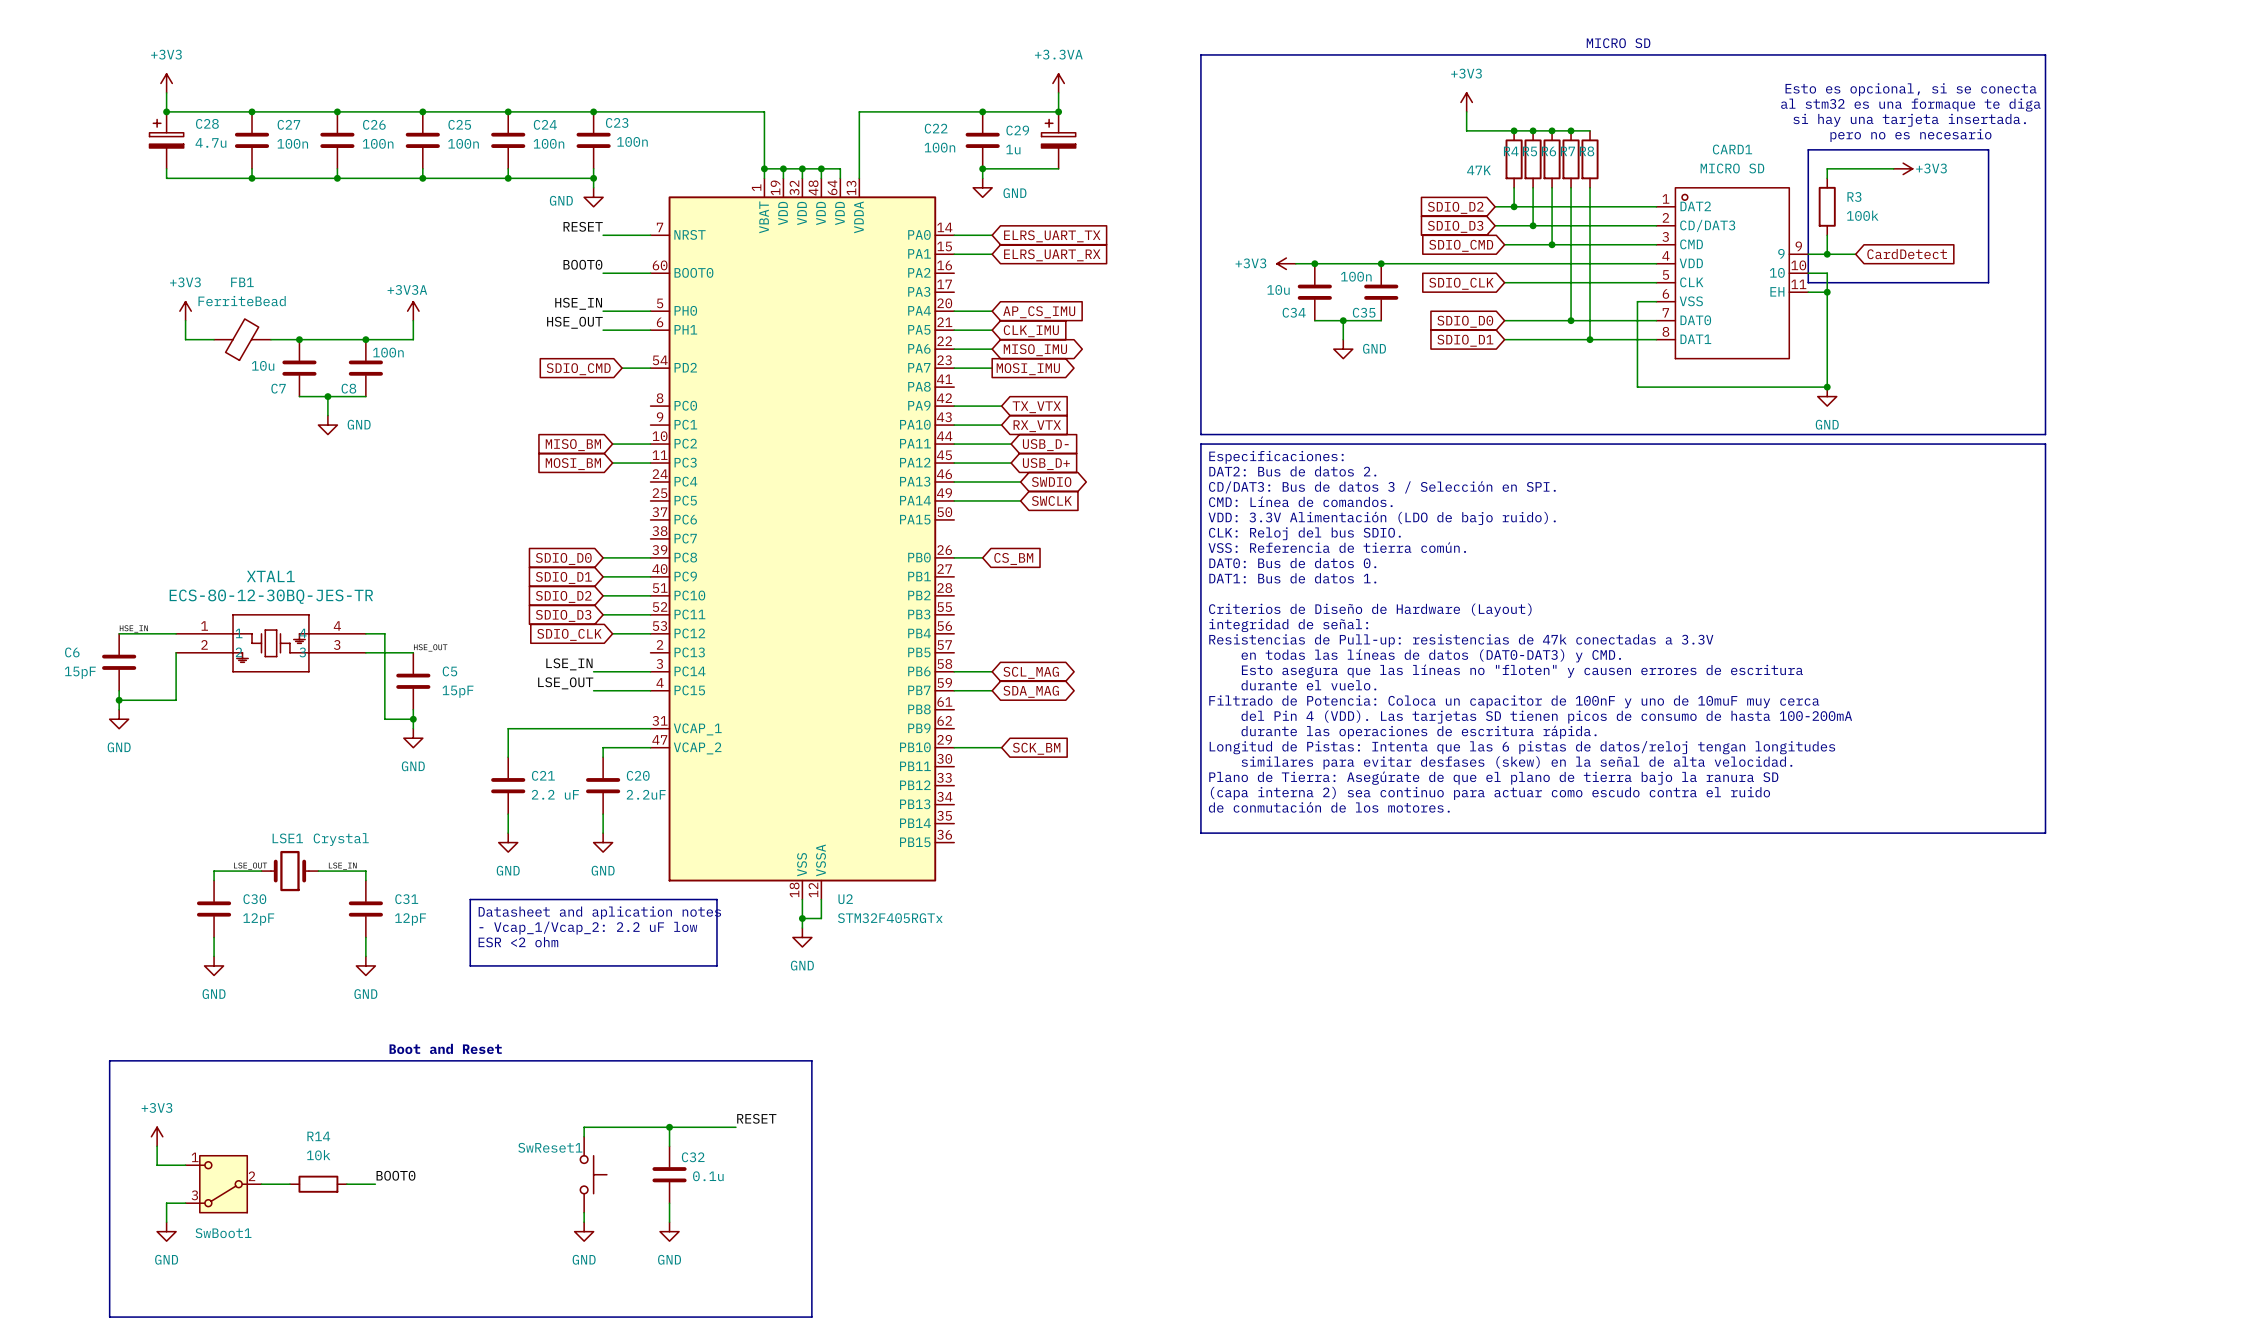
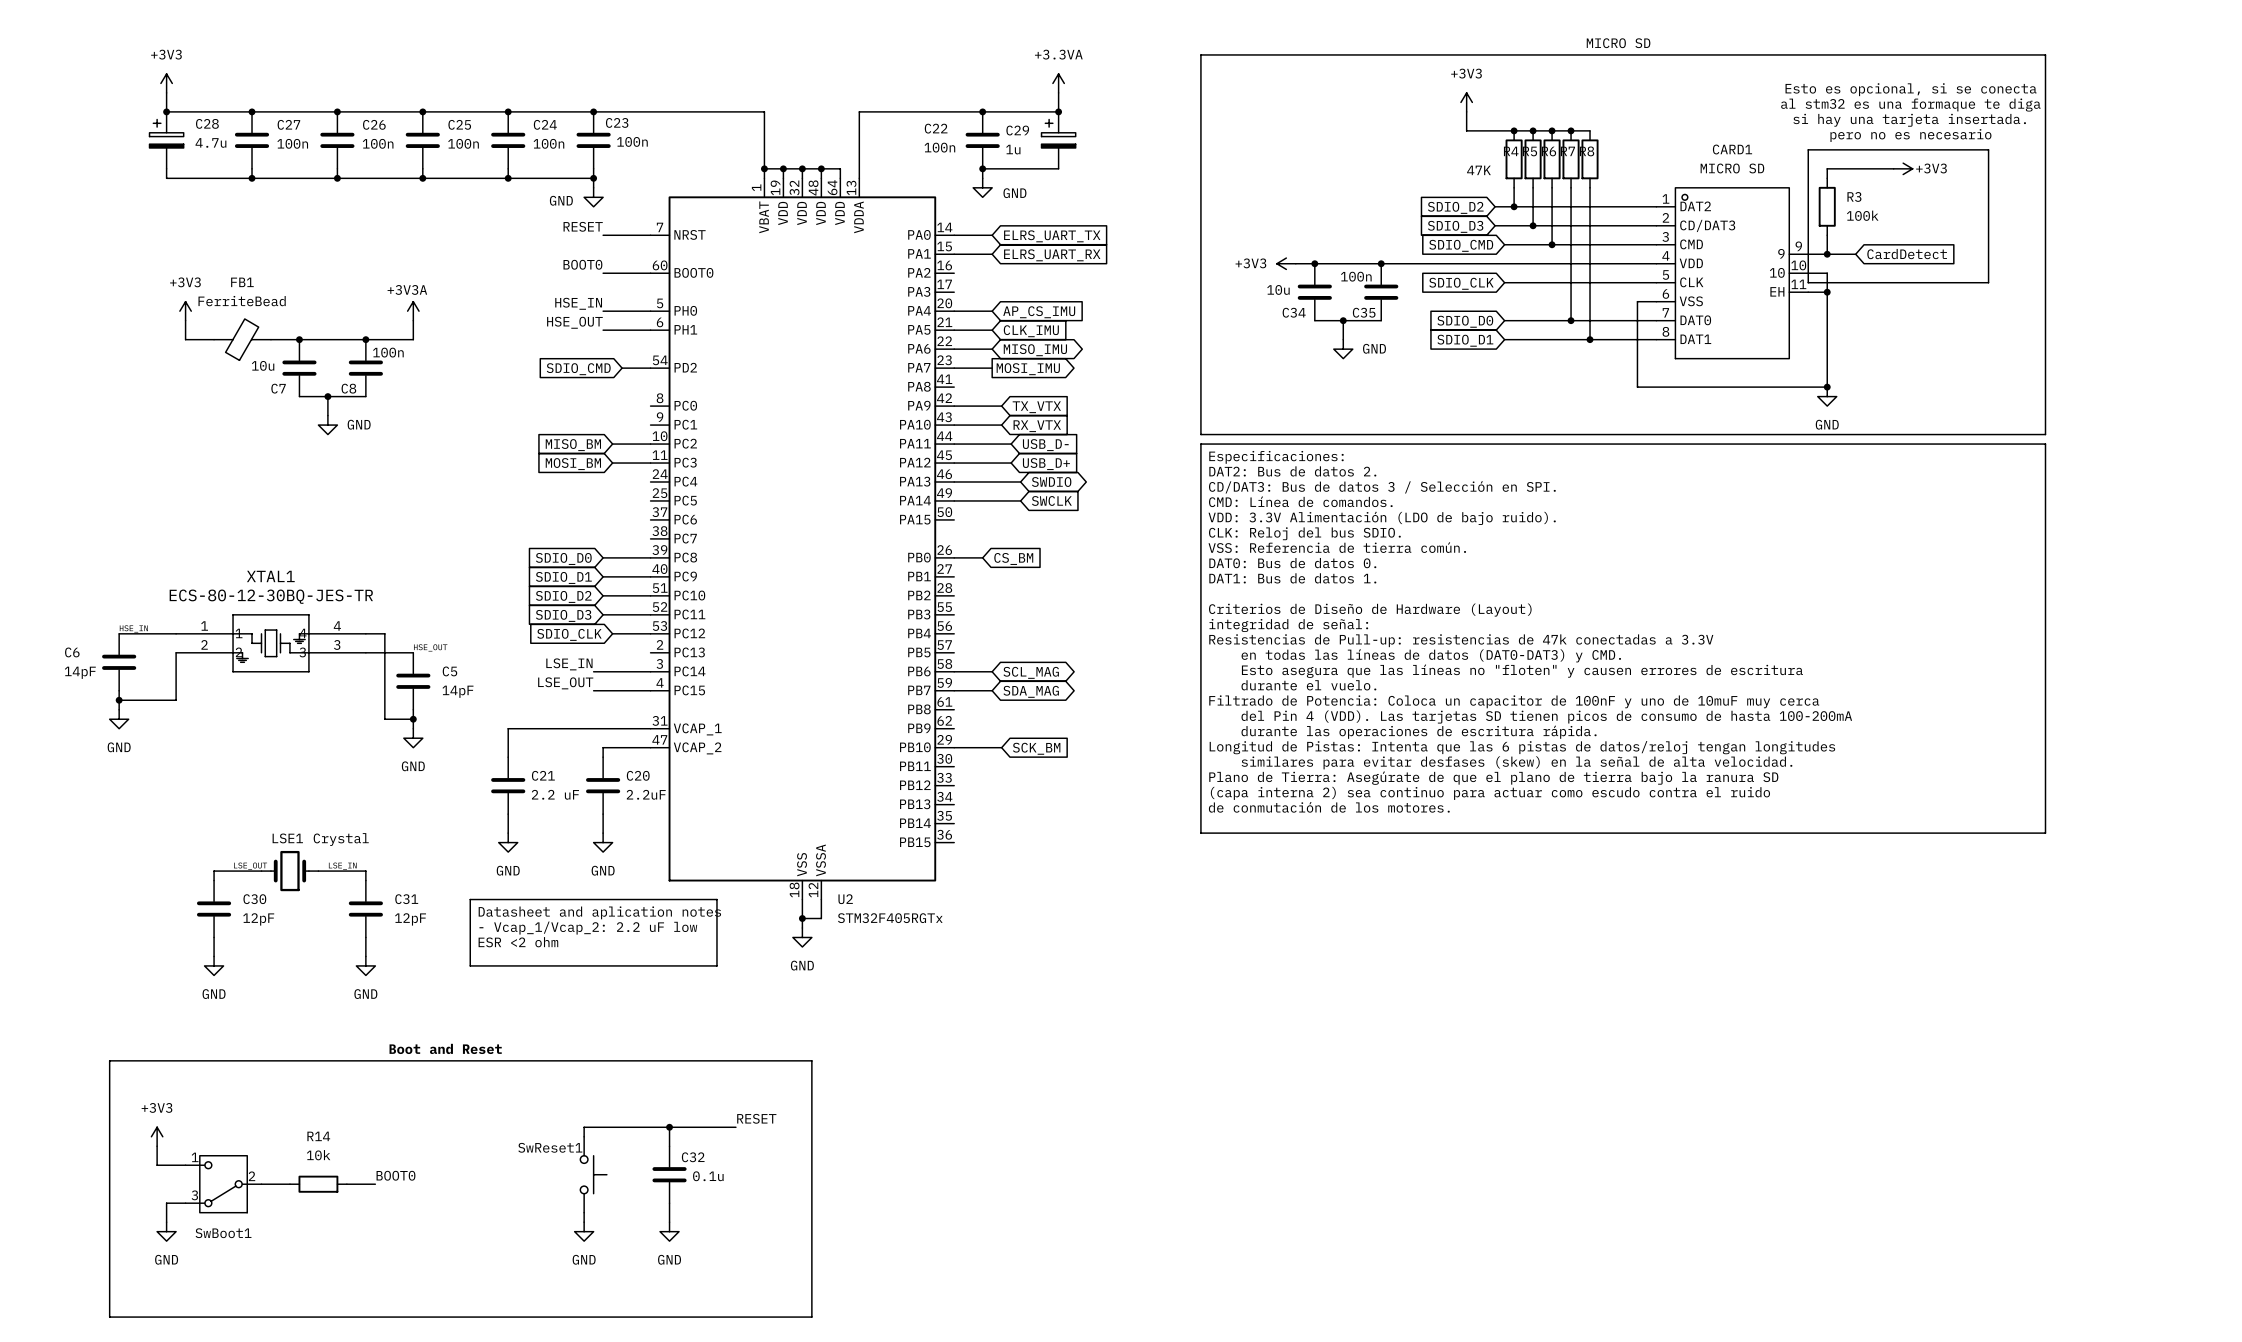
C6 value: 15pF (80, 672) -> 14pF (80, 672)
C5 value: 15pF (457, 691) -> 14pF (457, 691)

